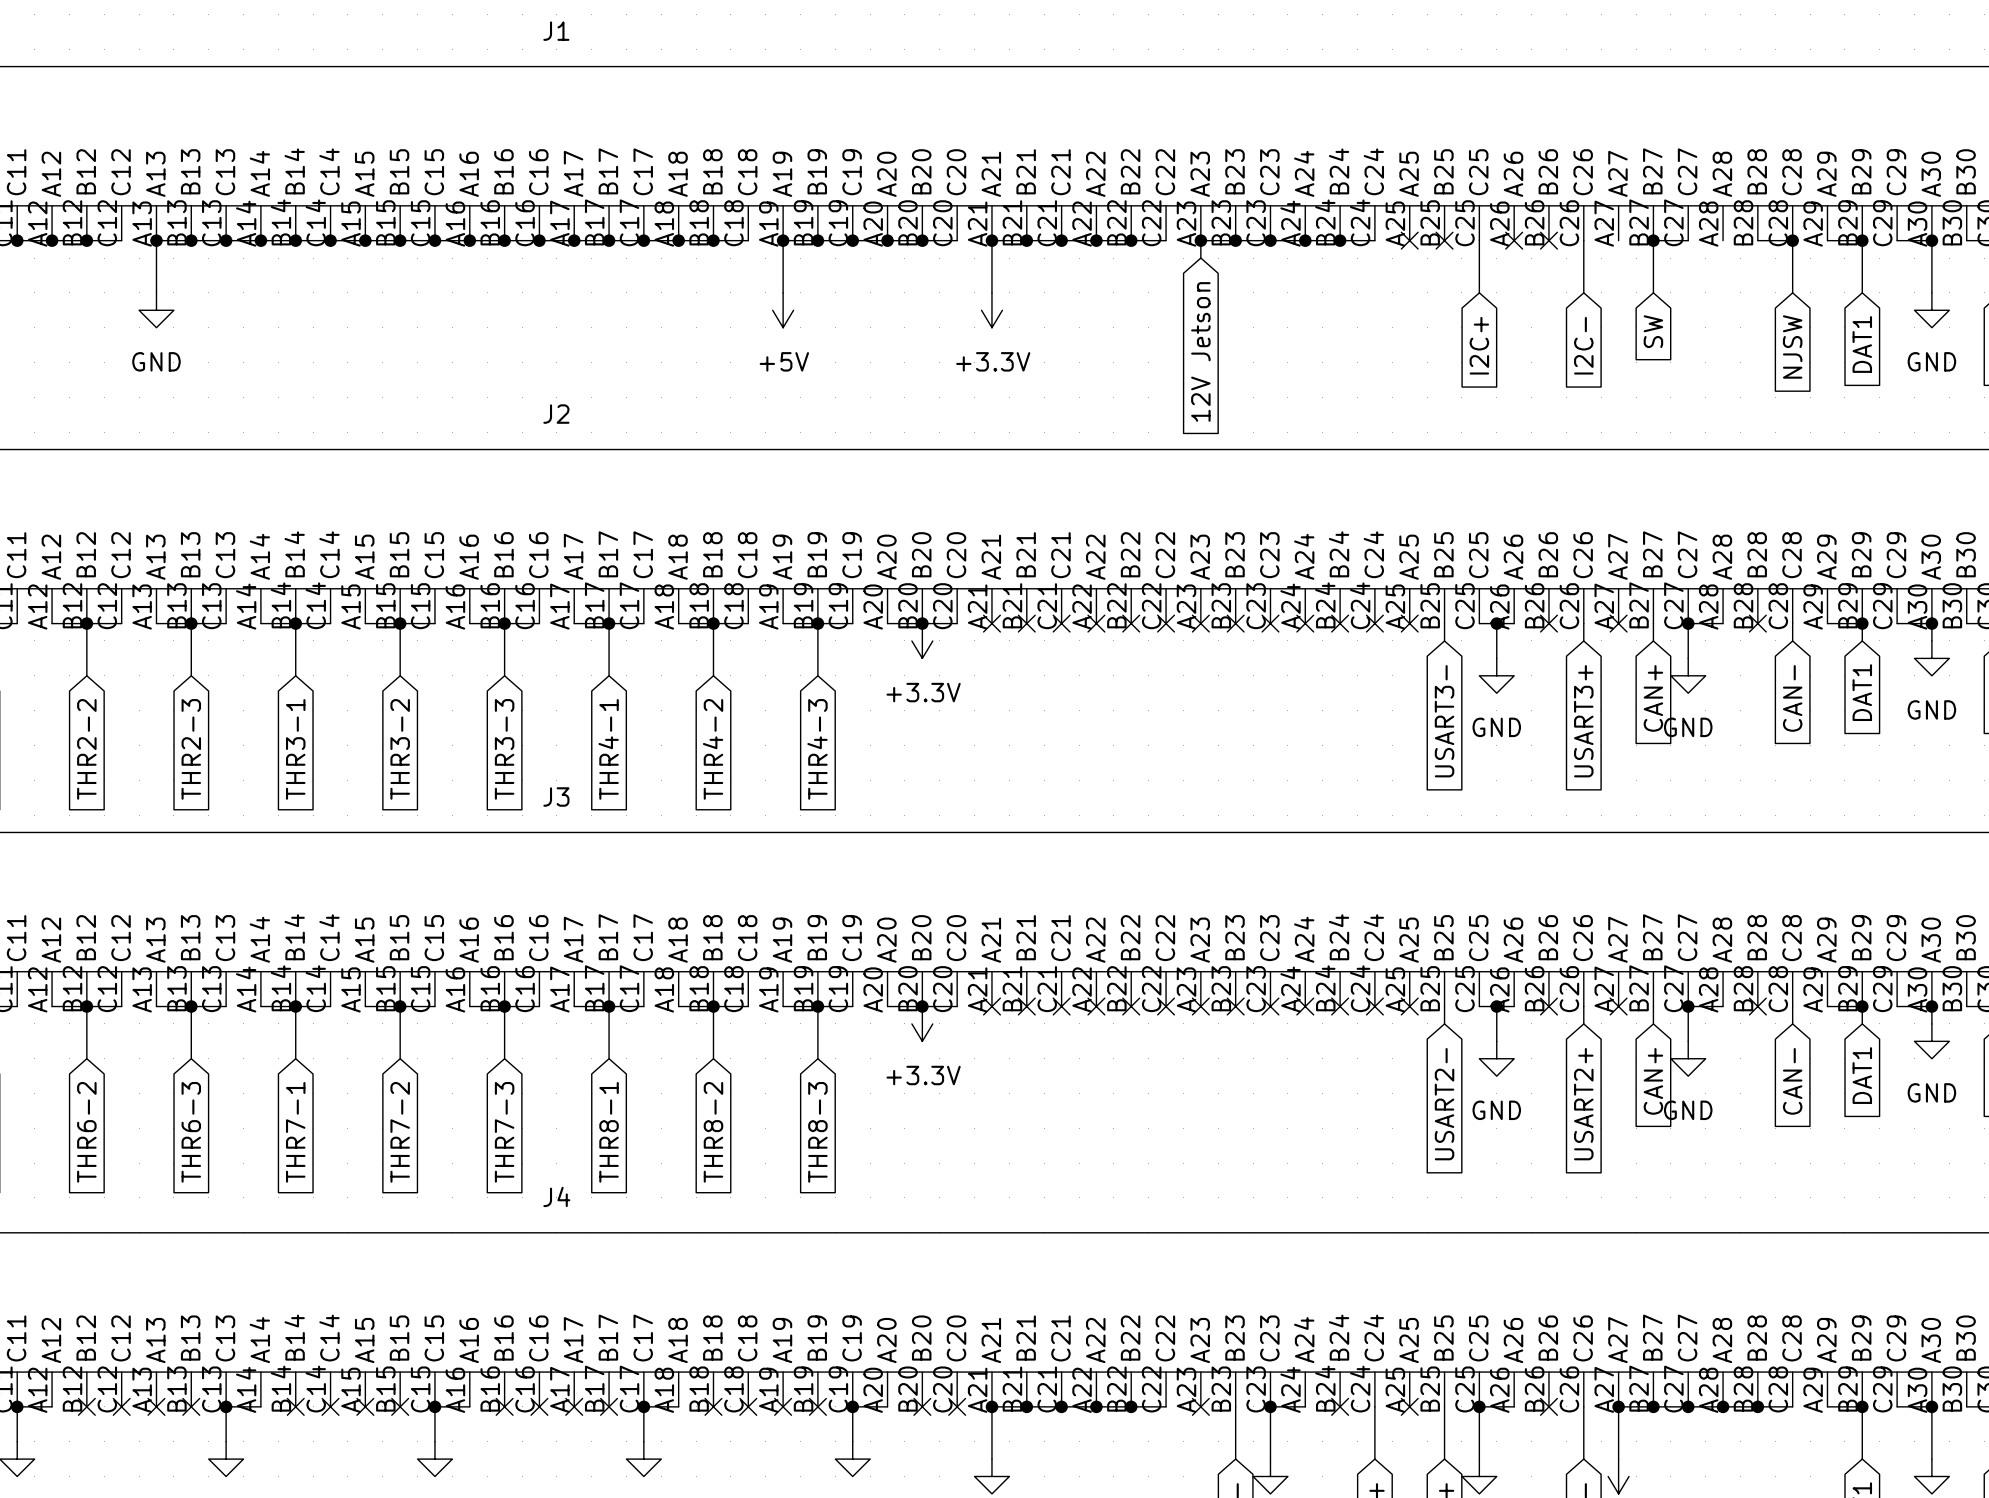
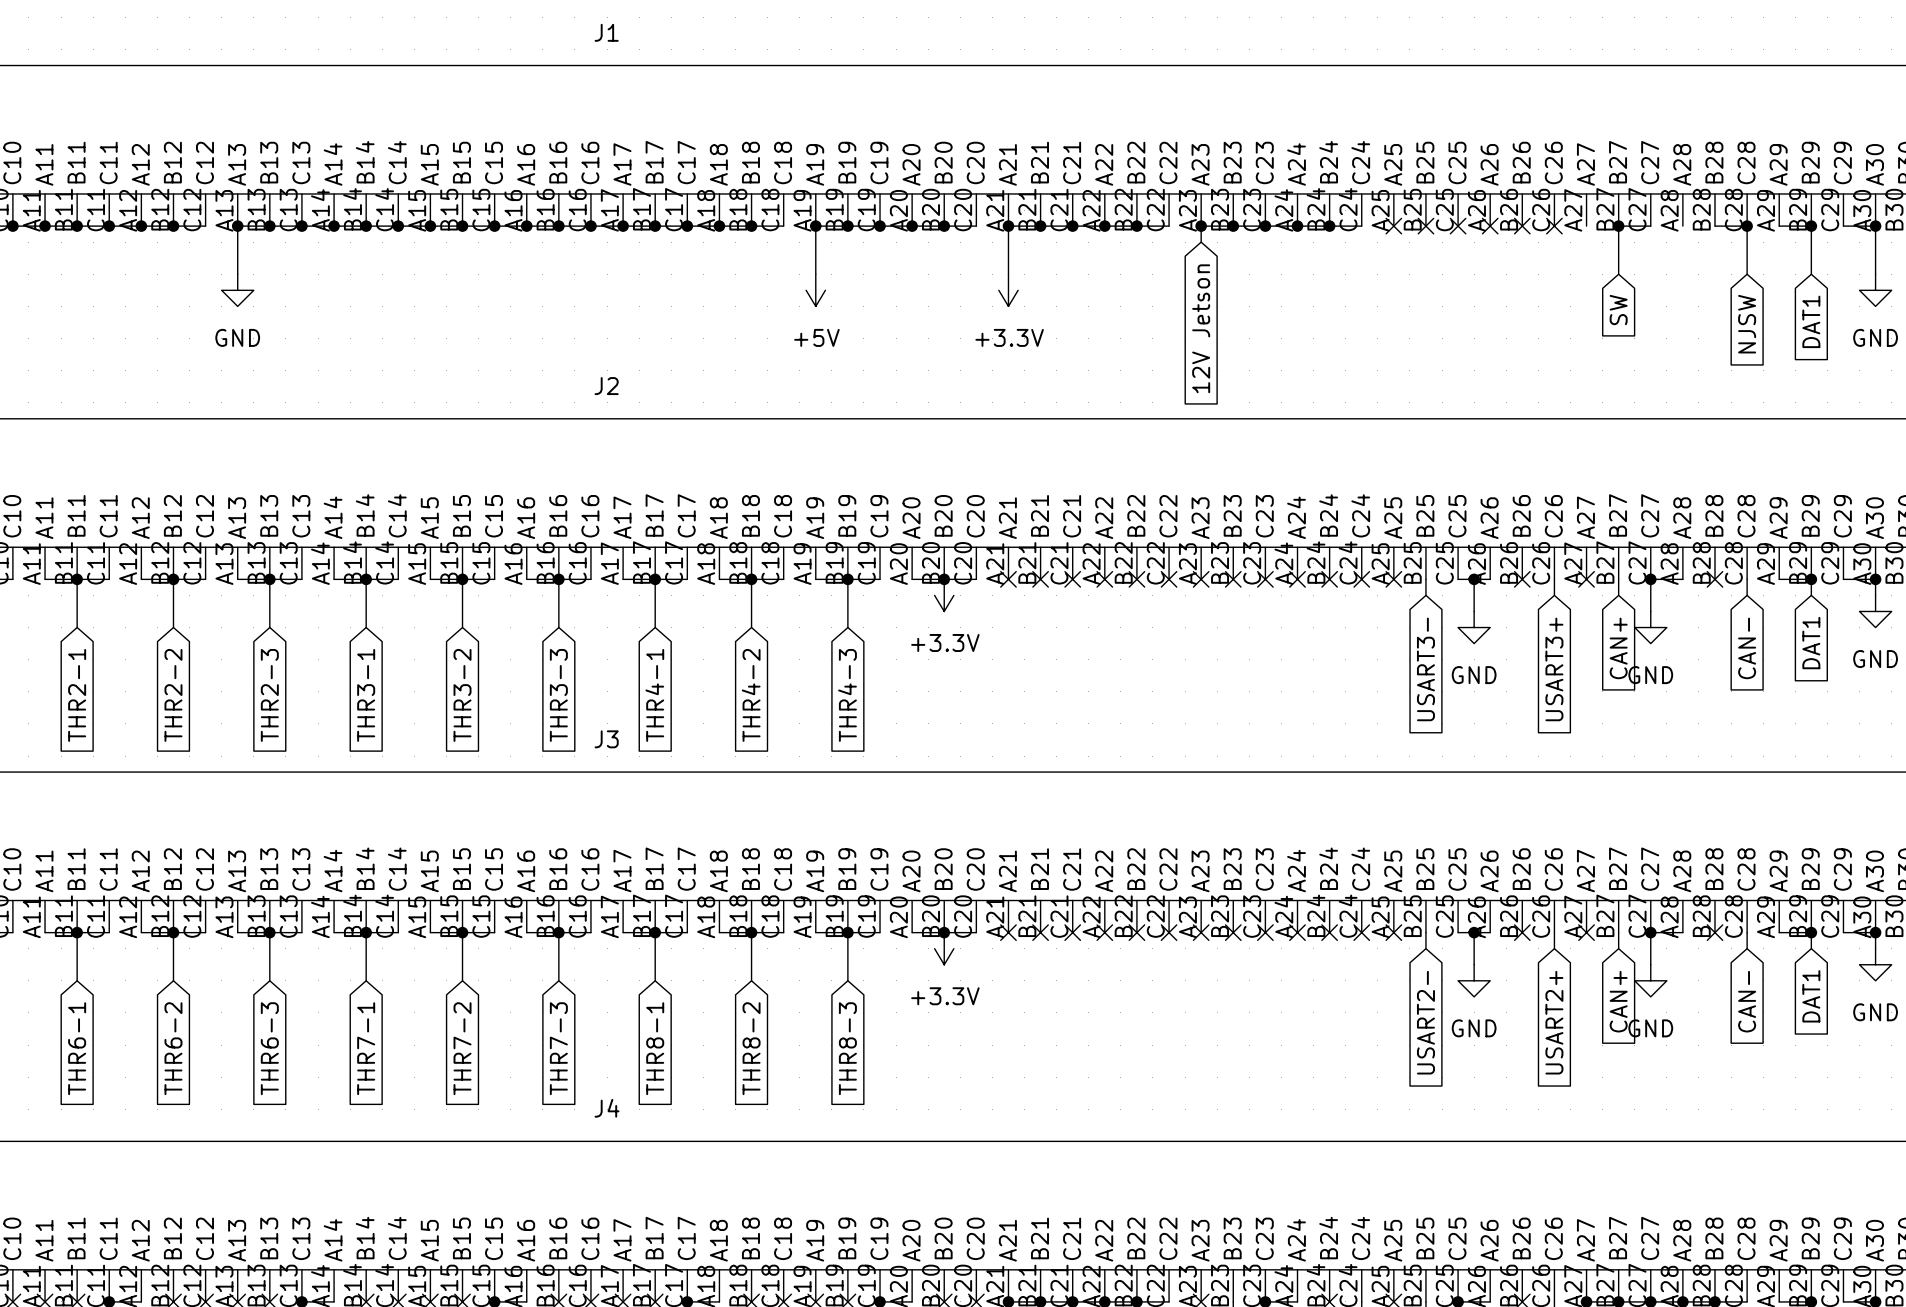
wire: (1479, 240) (1479, 292) -> none
no-connect mark: none -> (1458, 226)
wire: (1583, 240) (1583, 292) -> none
no-connect mark: none -> (1554, 226)
global label: I2C+ (1479, 345) -> none
global label: I2C- (1583, 345) -> none

